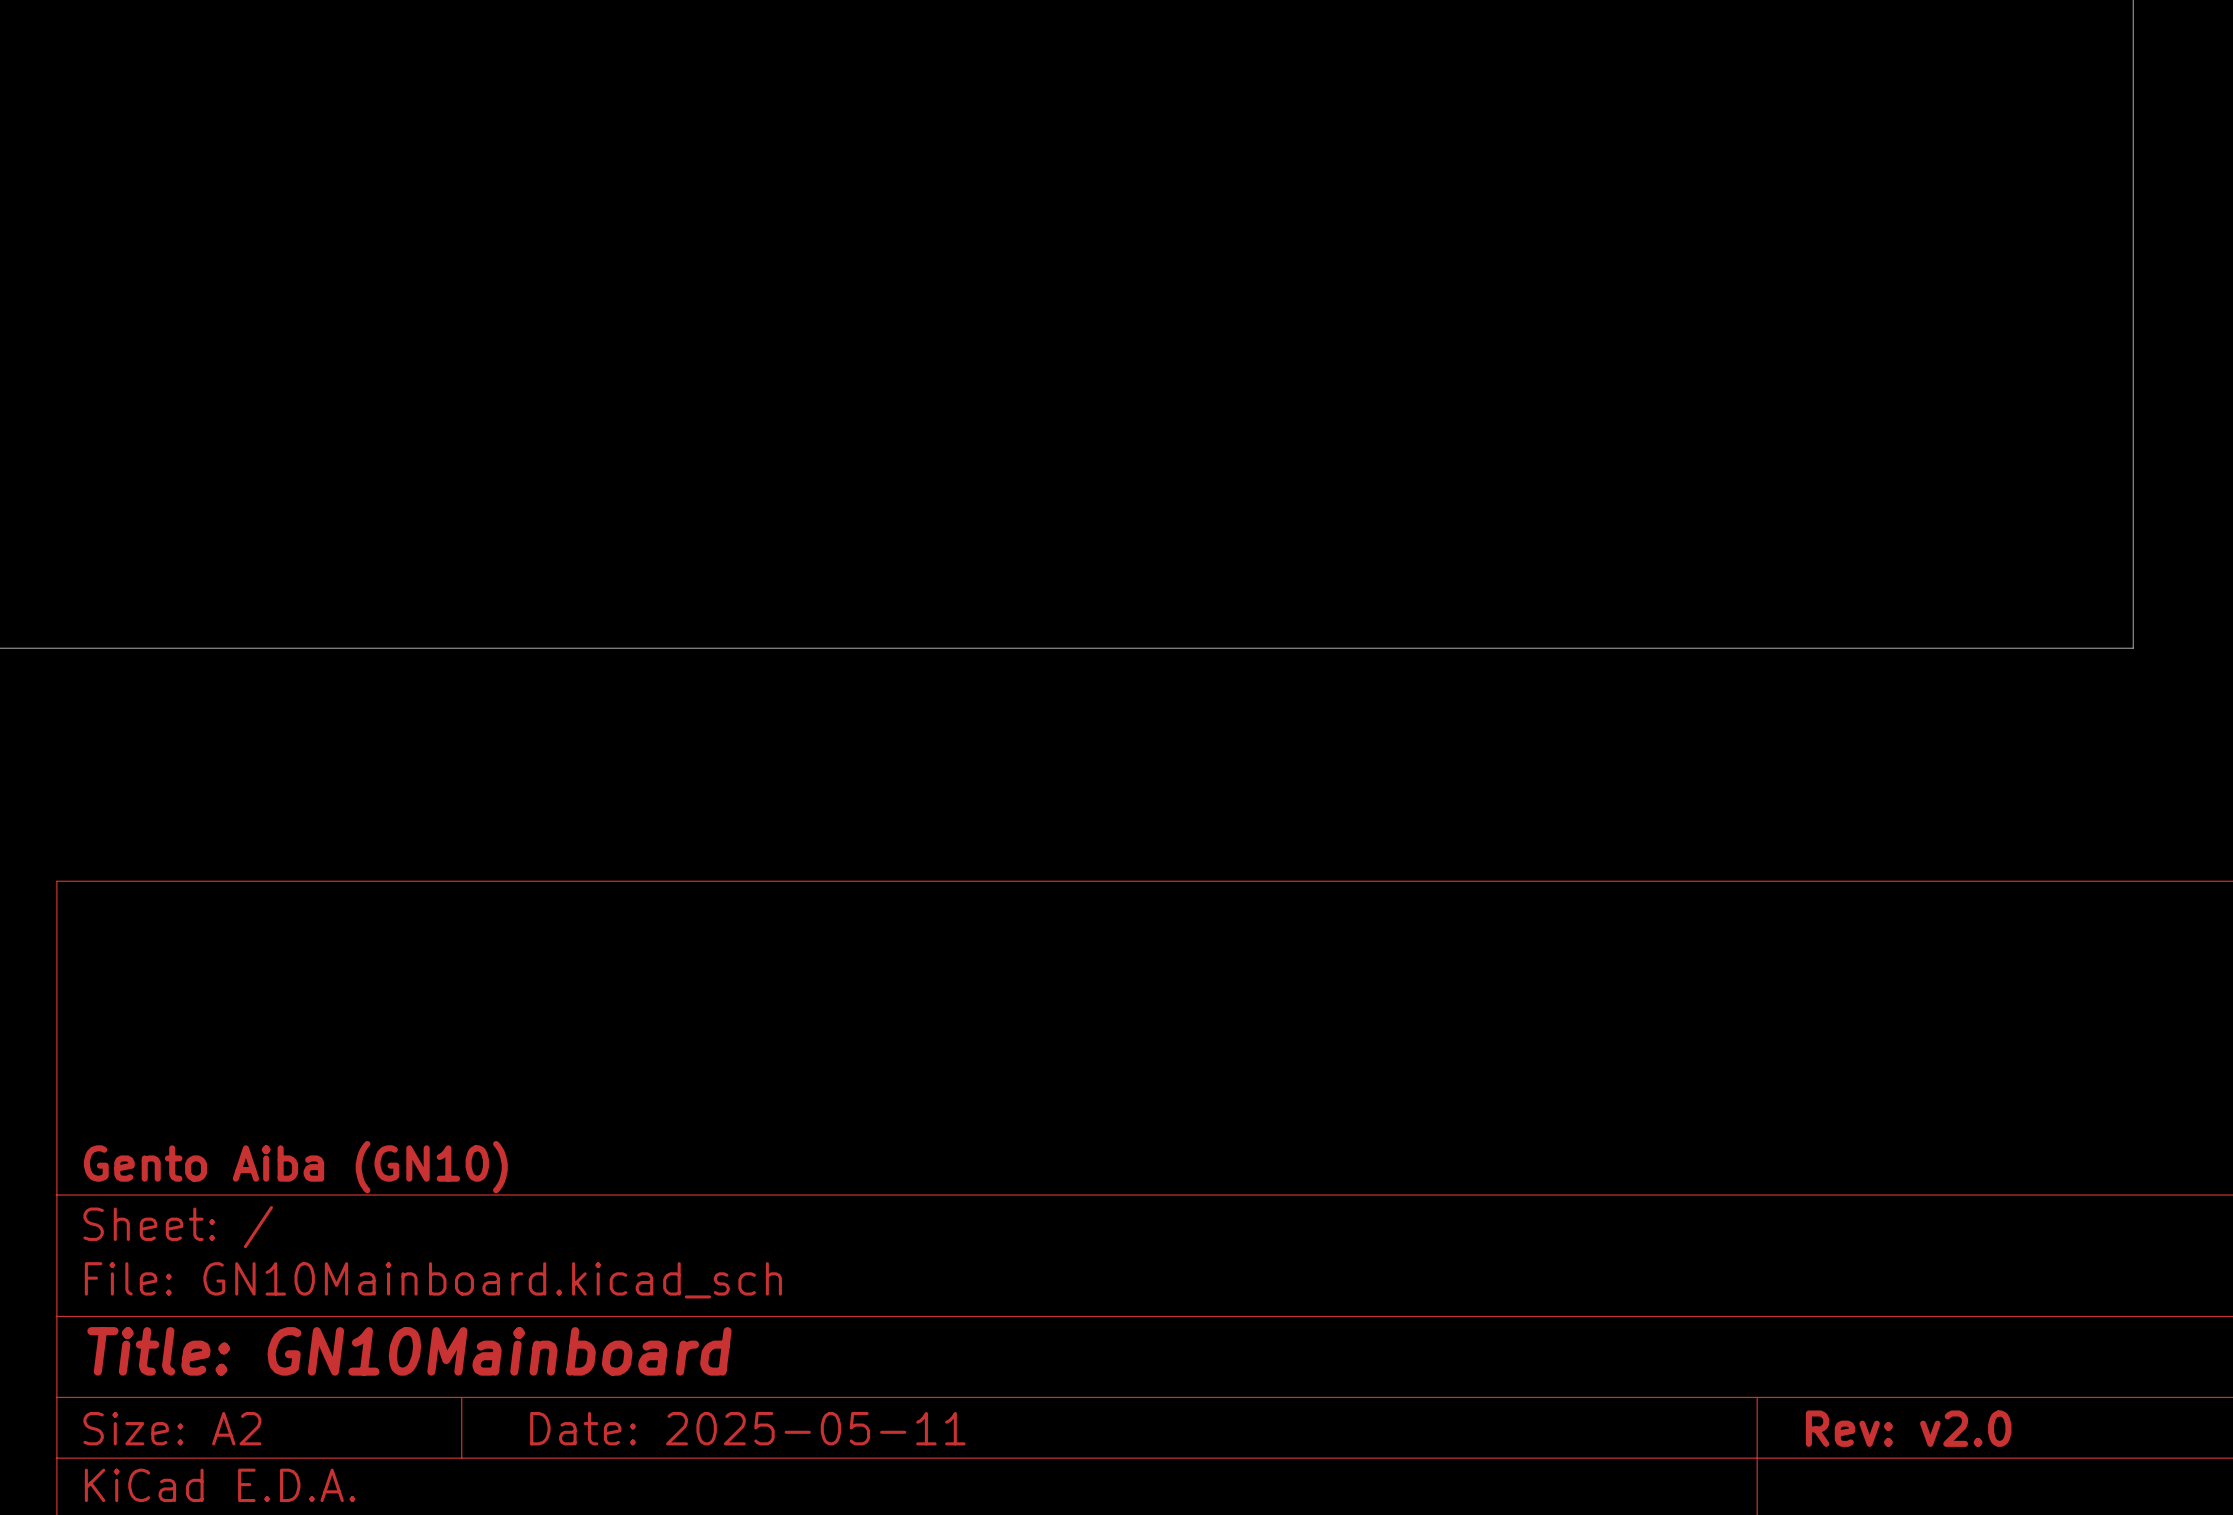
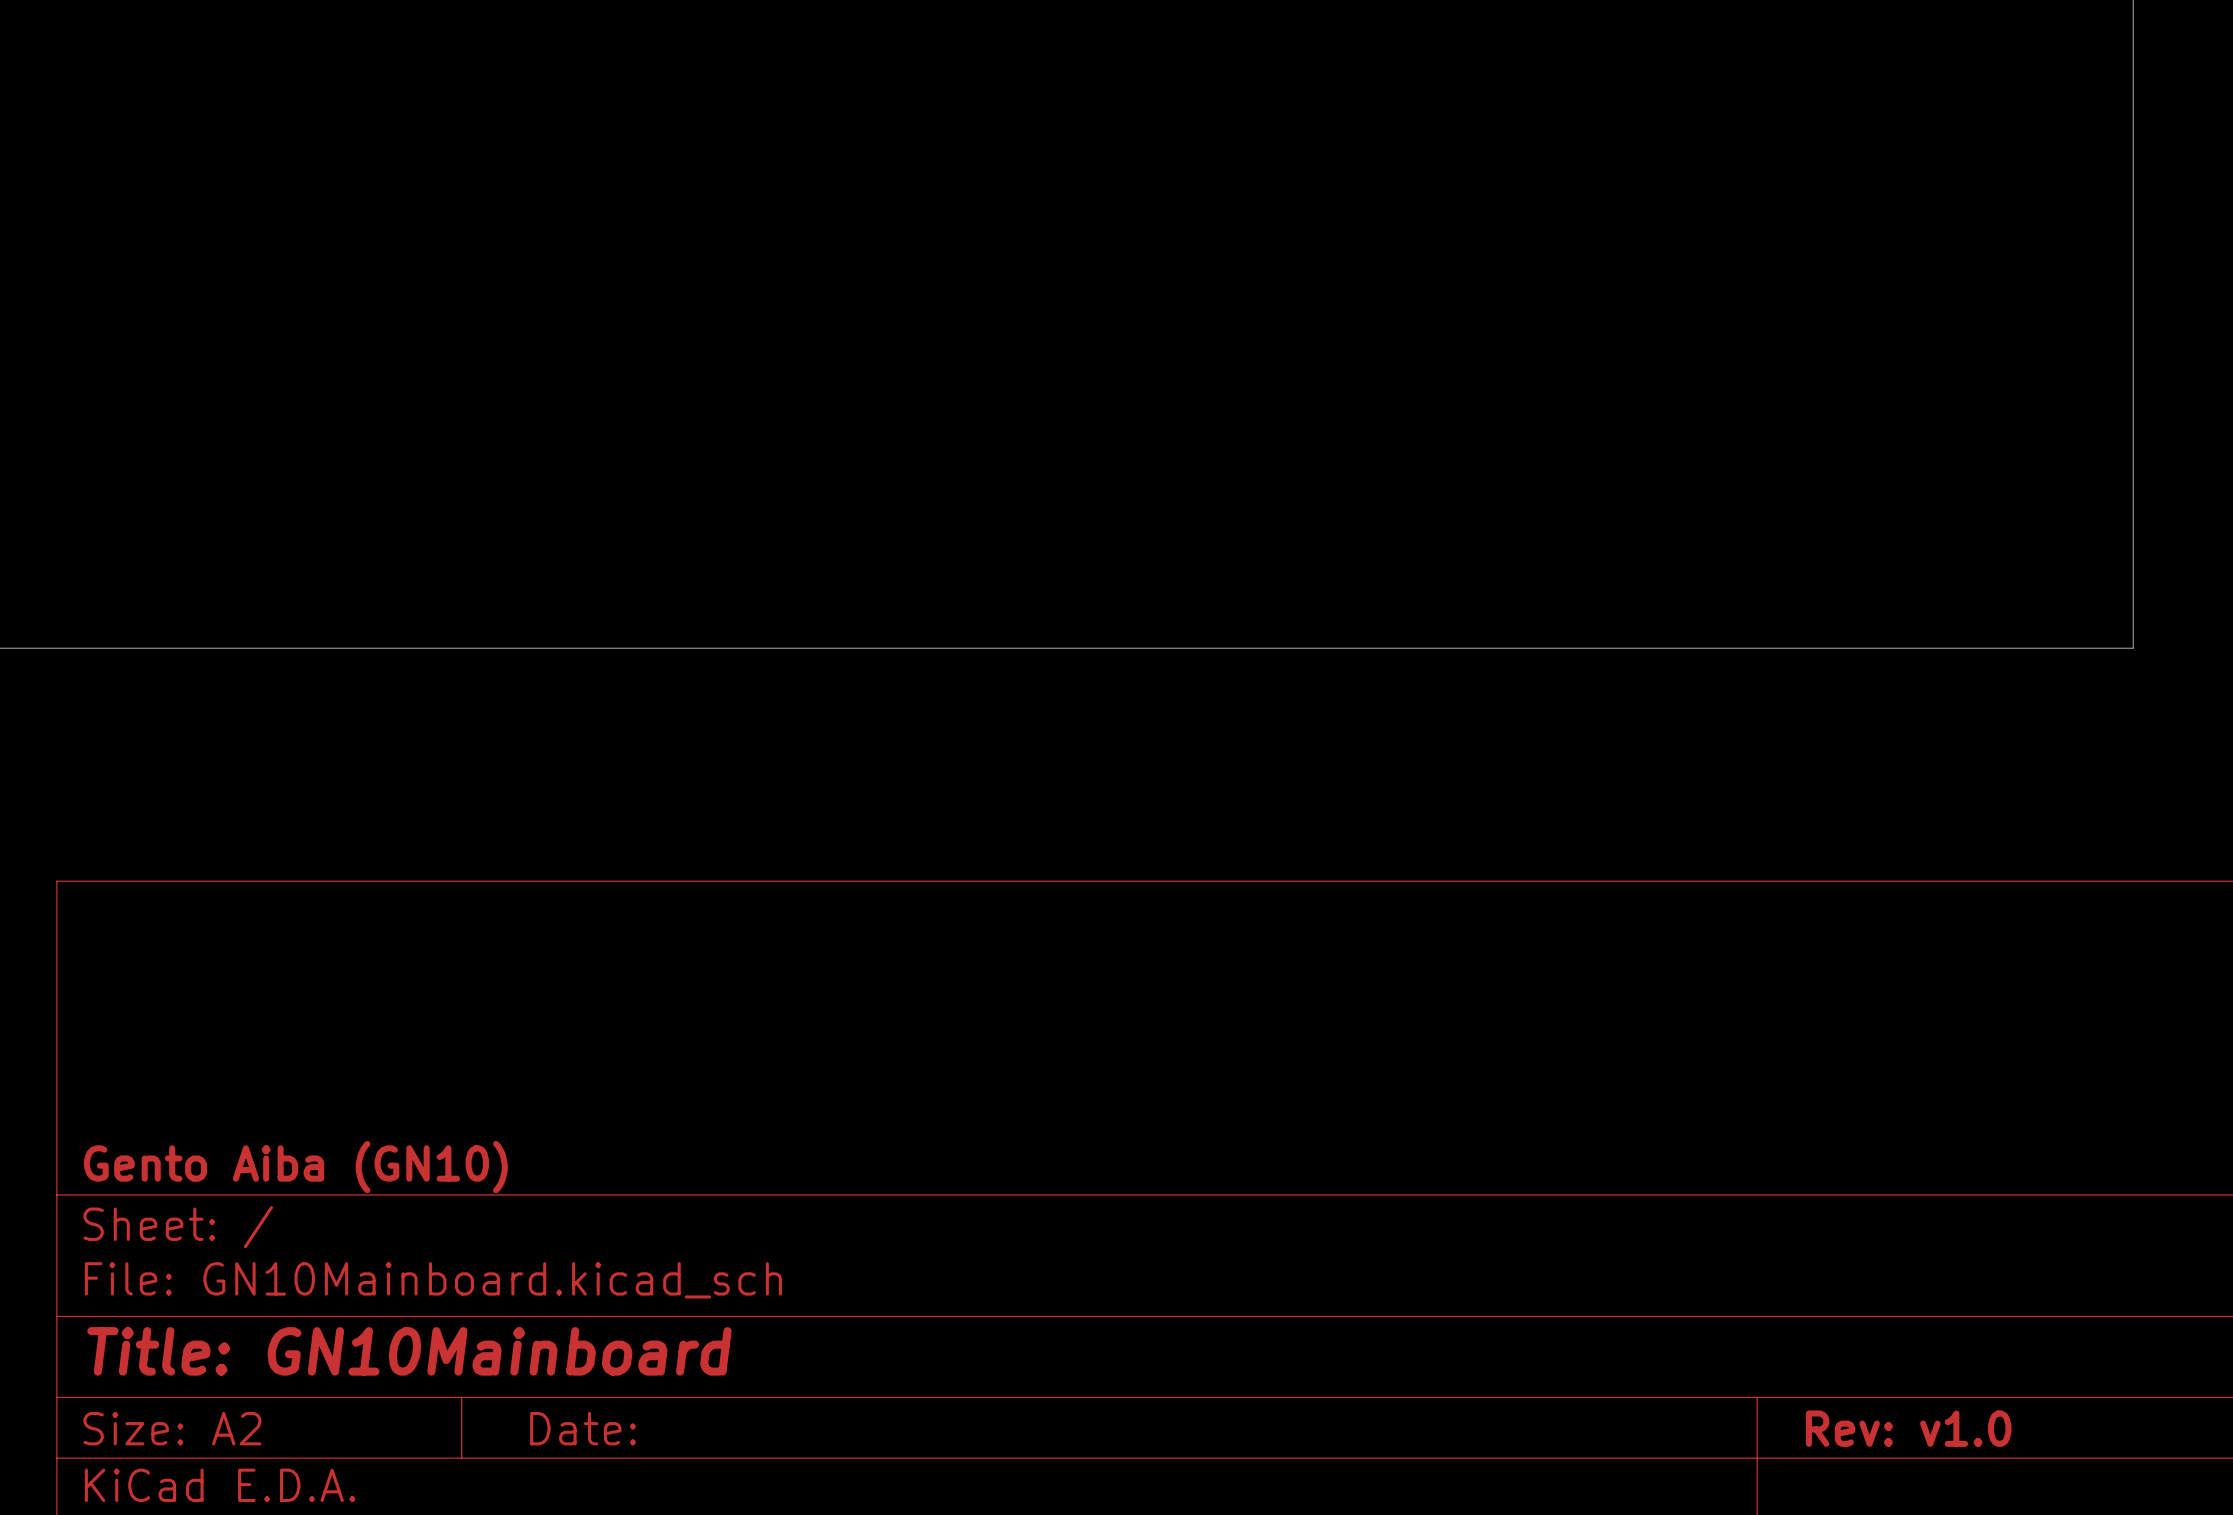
title block: Date: 2025-05-11 (747, 1428) -> Date: (583, 1428)
title block: Rev: v2.0 (1908, 1428) -> Rev: v1.0 (1908, 1428)

